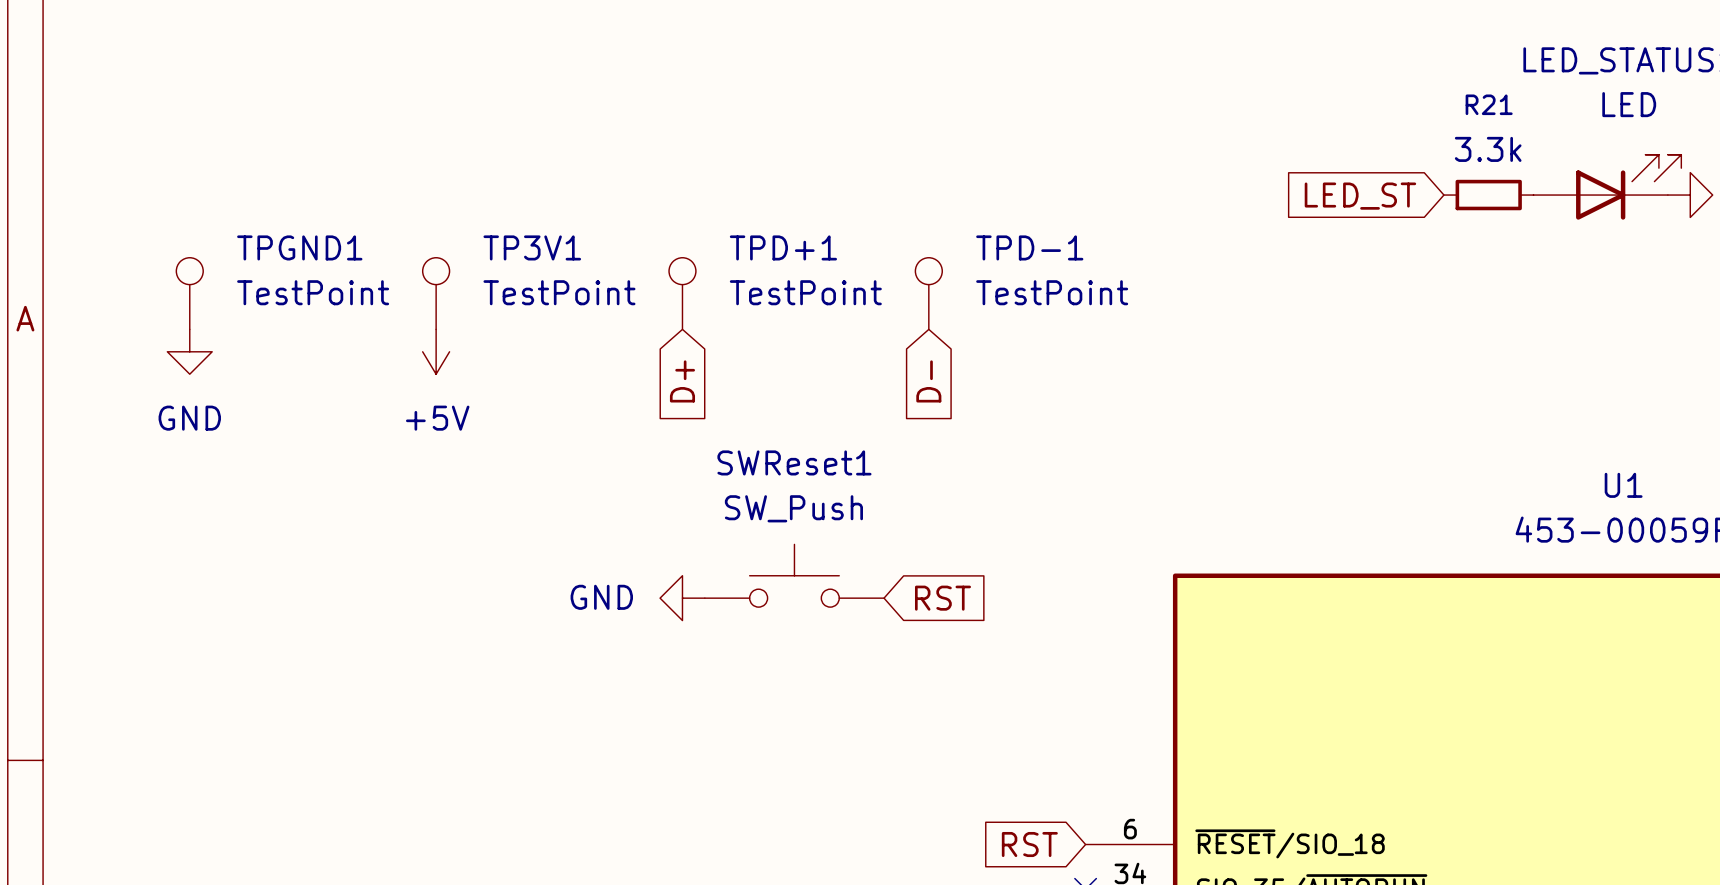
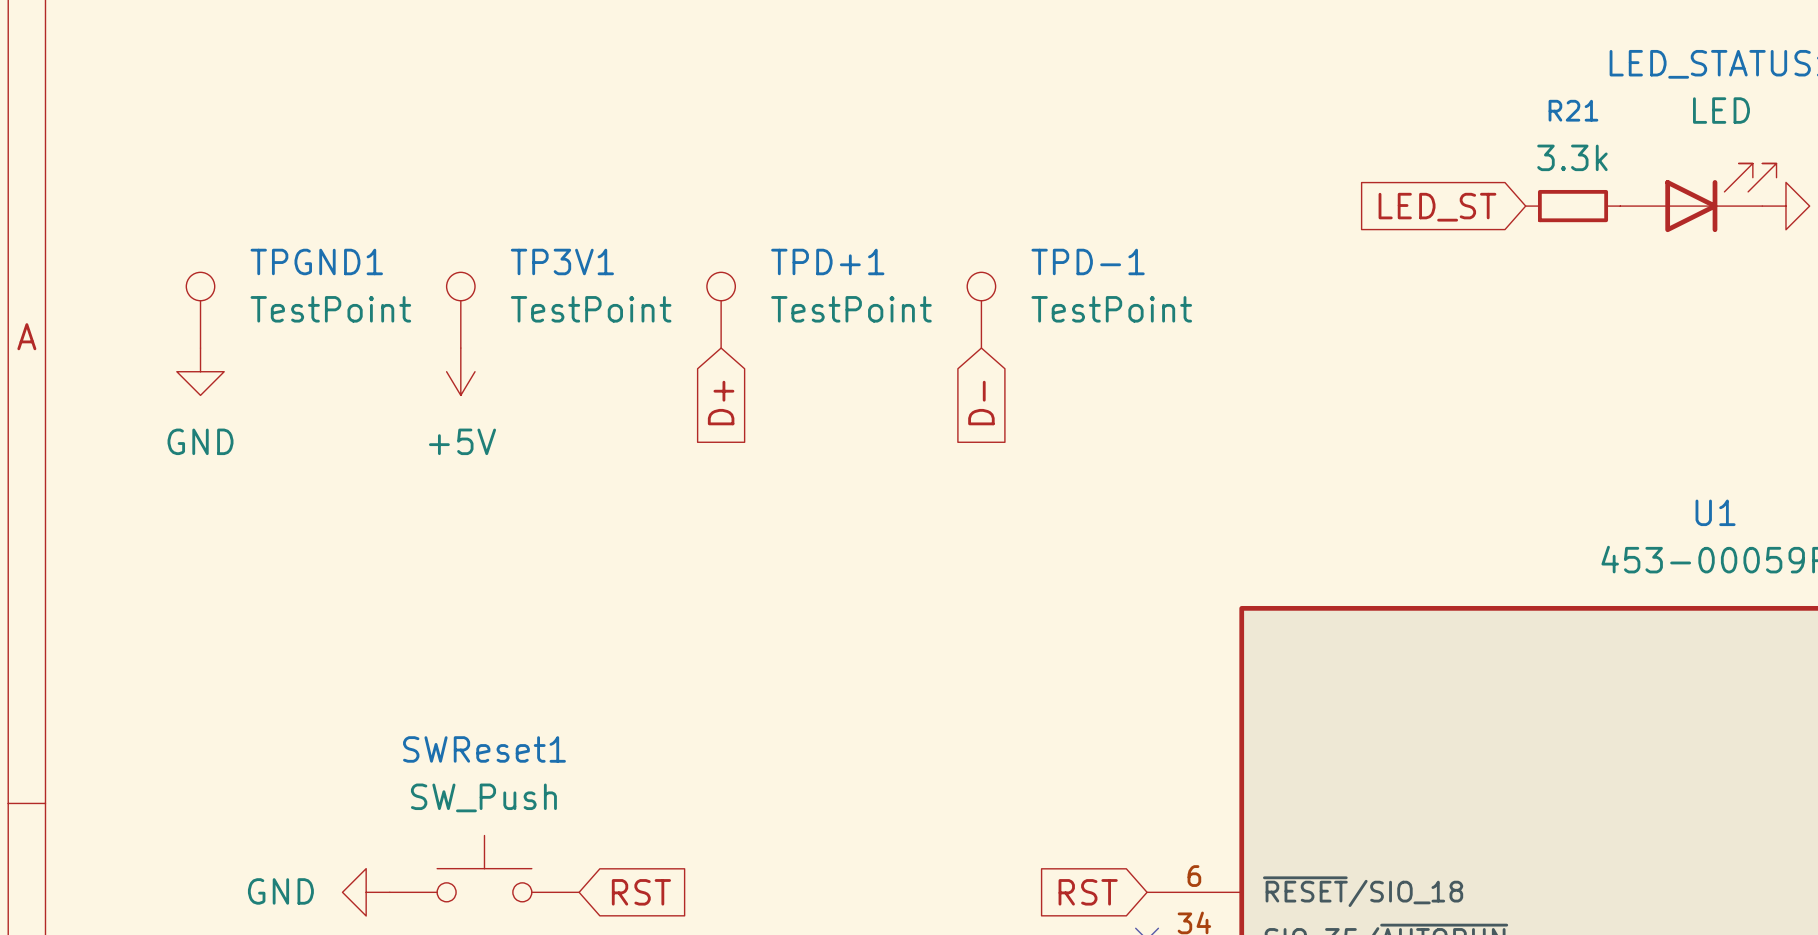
SWReset1 position: (794, 575) -> (484, 868)
power symbol position: GND (682, 598) -> GND (366, 892)
global label position: RST (942, 598) -> RST (641, 892)

